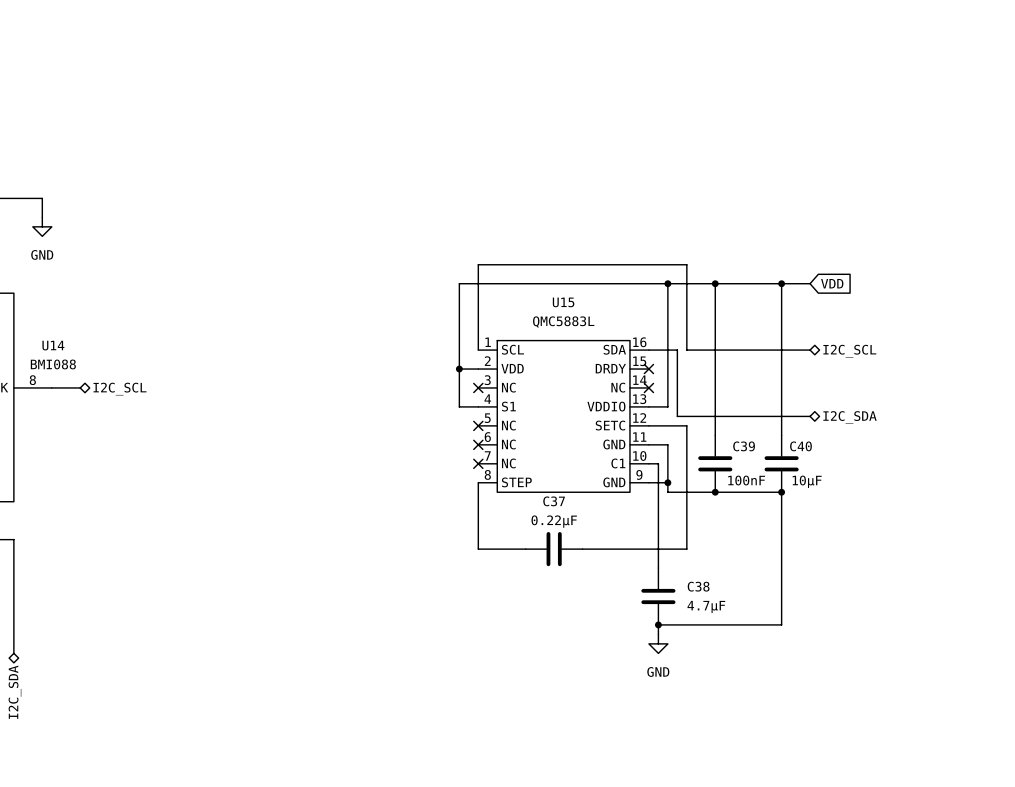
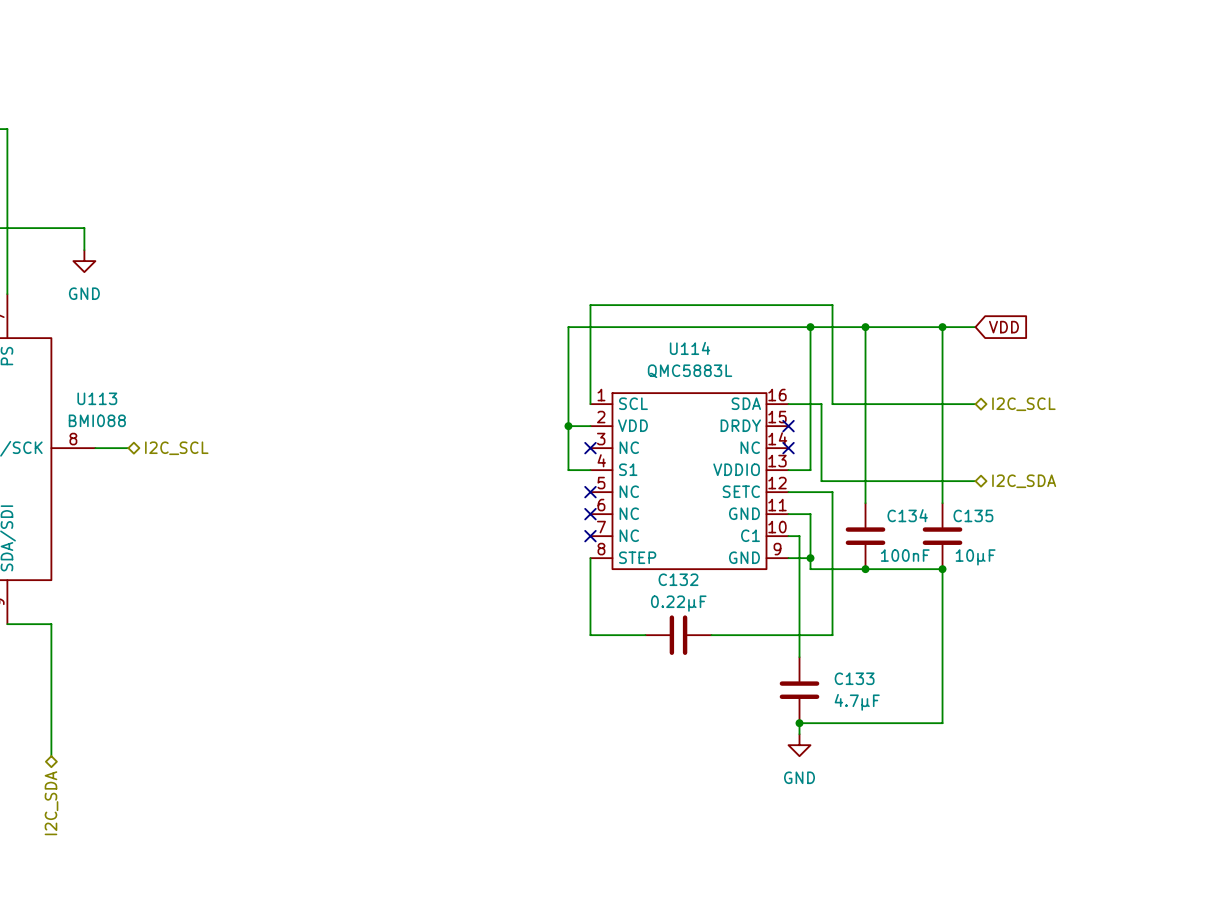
U15 name: U15 (563, 302) -> U114 (690, 348)
U14 name: U14 (53, 345) -> U113 (97, 398)
C39 name: C39 (744, 446) -> C134 (907, 515)
C40 name: C40 (800, 446) -> C135 (973, 515)
C37 name: C37 (554, 501) -> C132 (678, 579)
C38 name: C38 (698, 586) -> C133 (854, 678)

